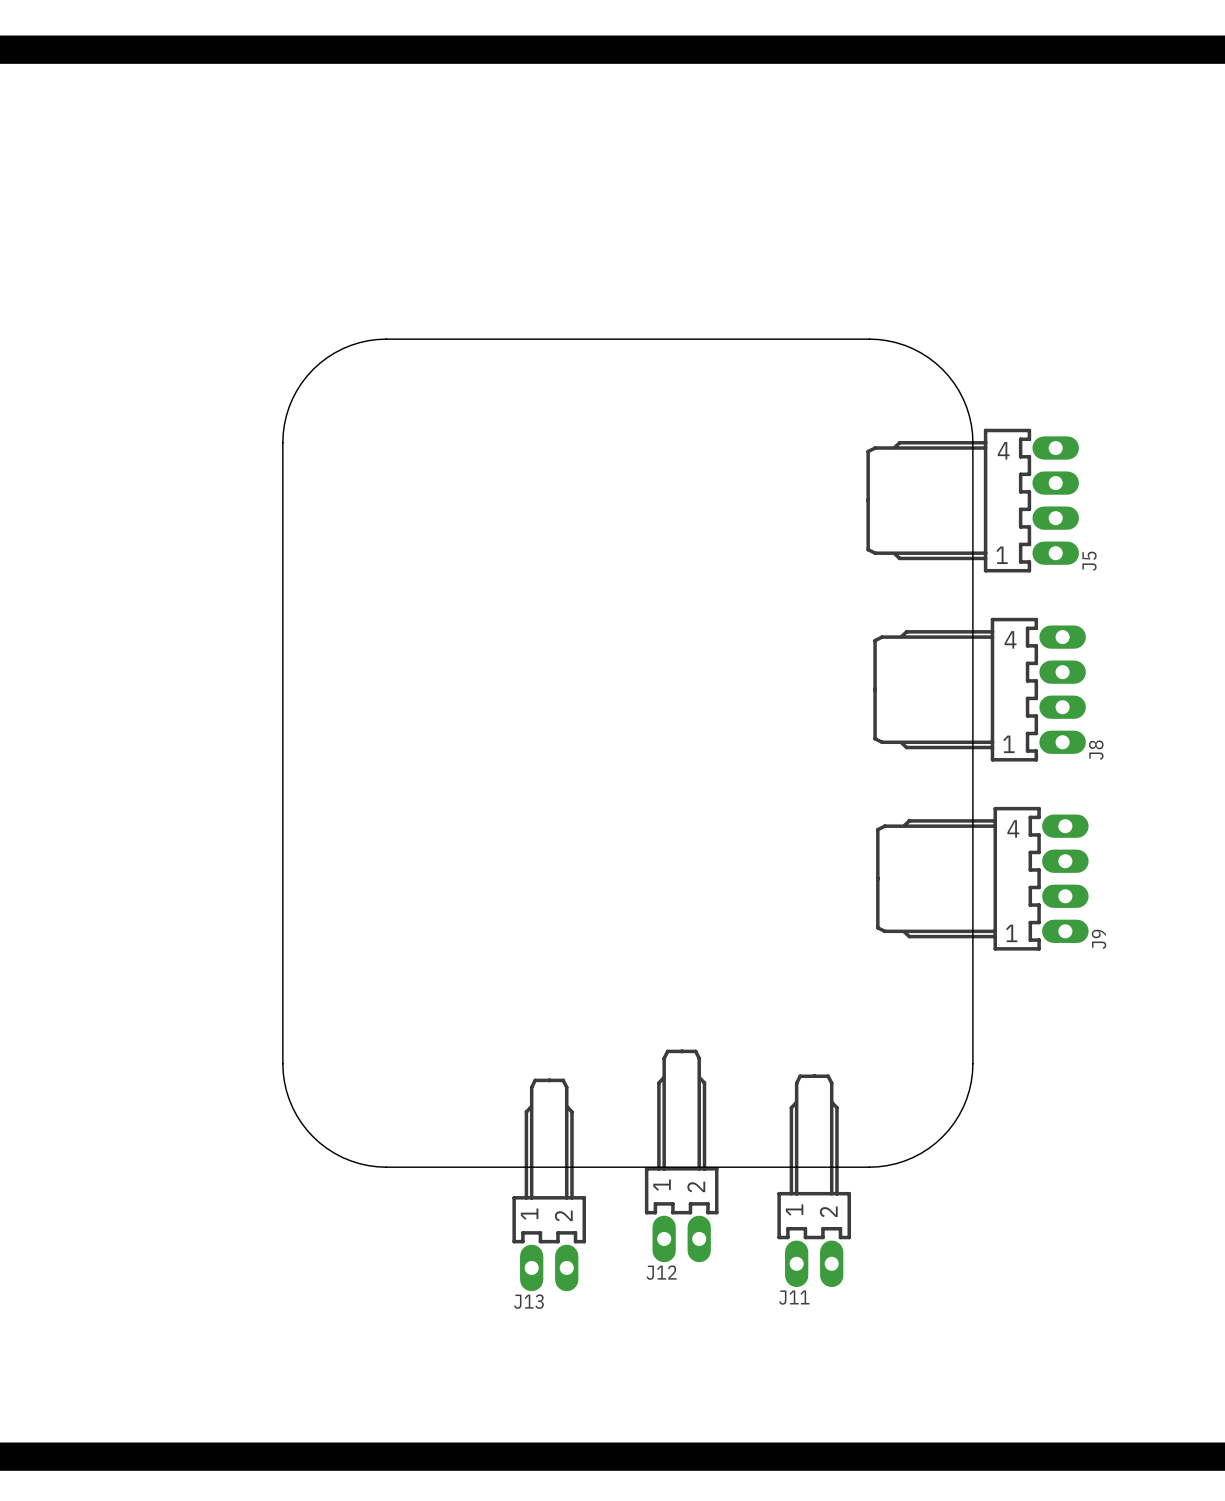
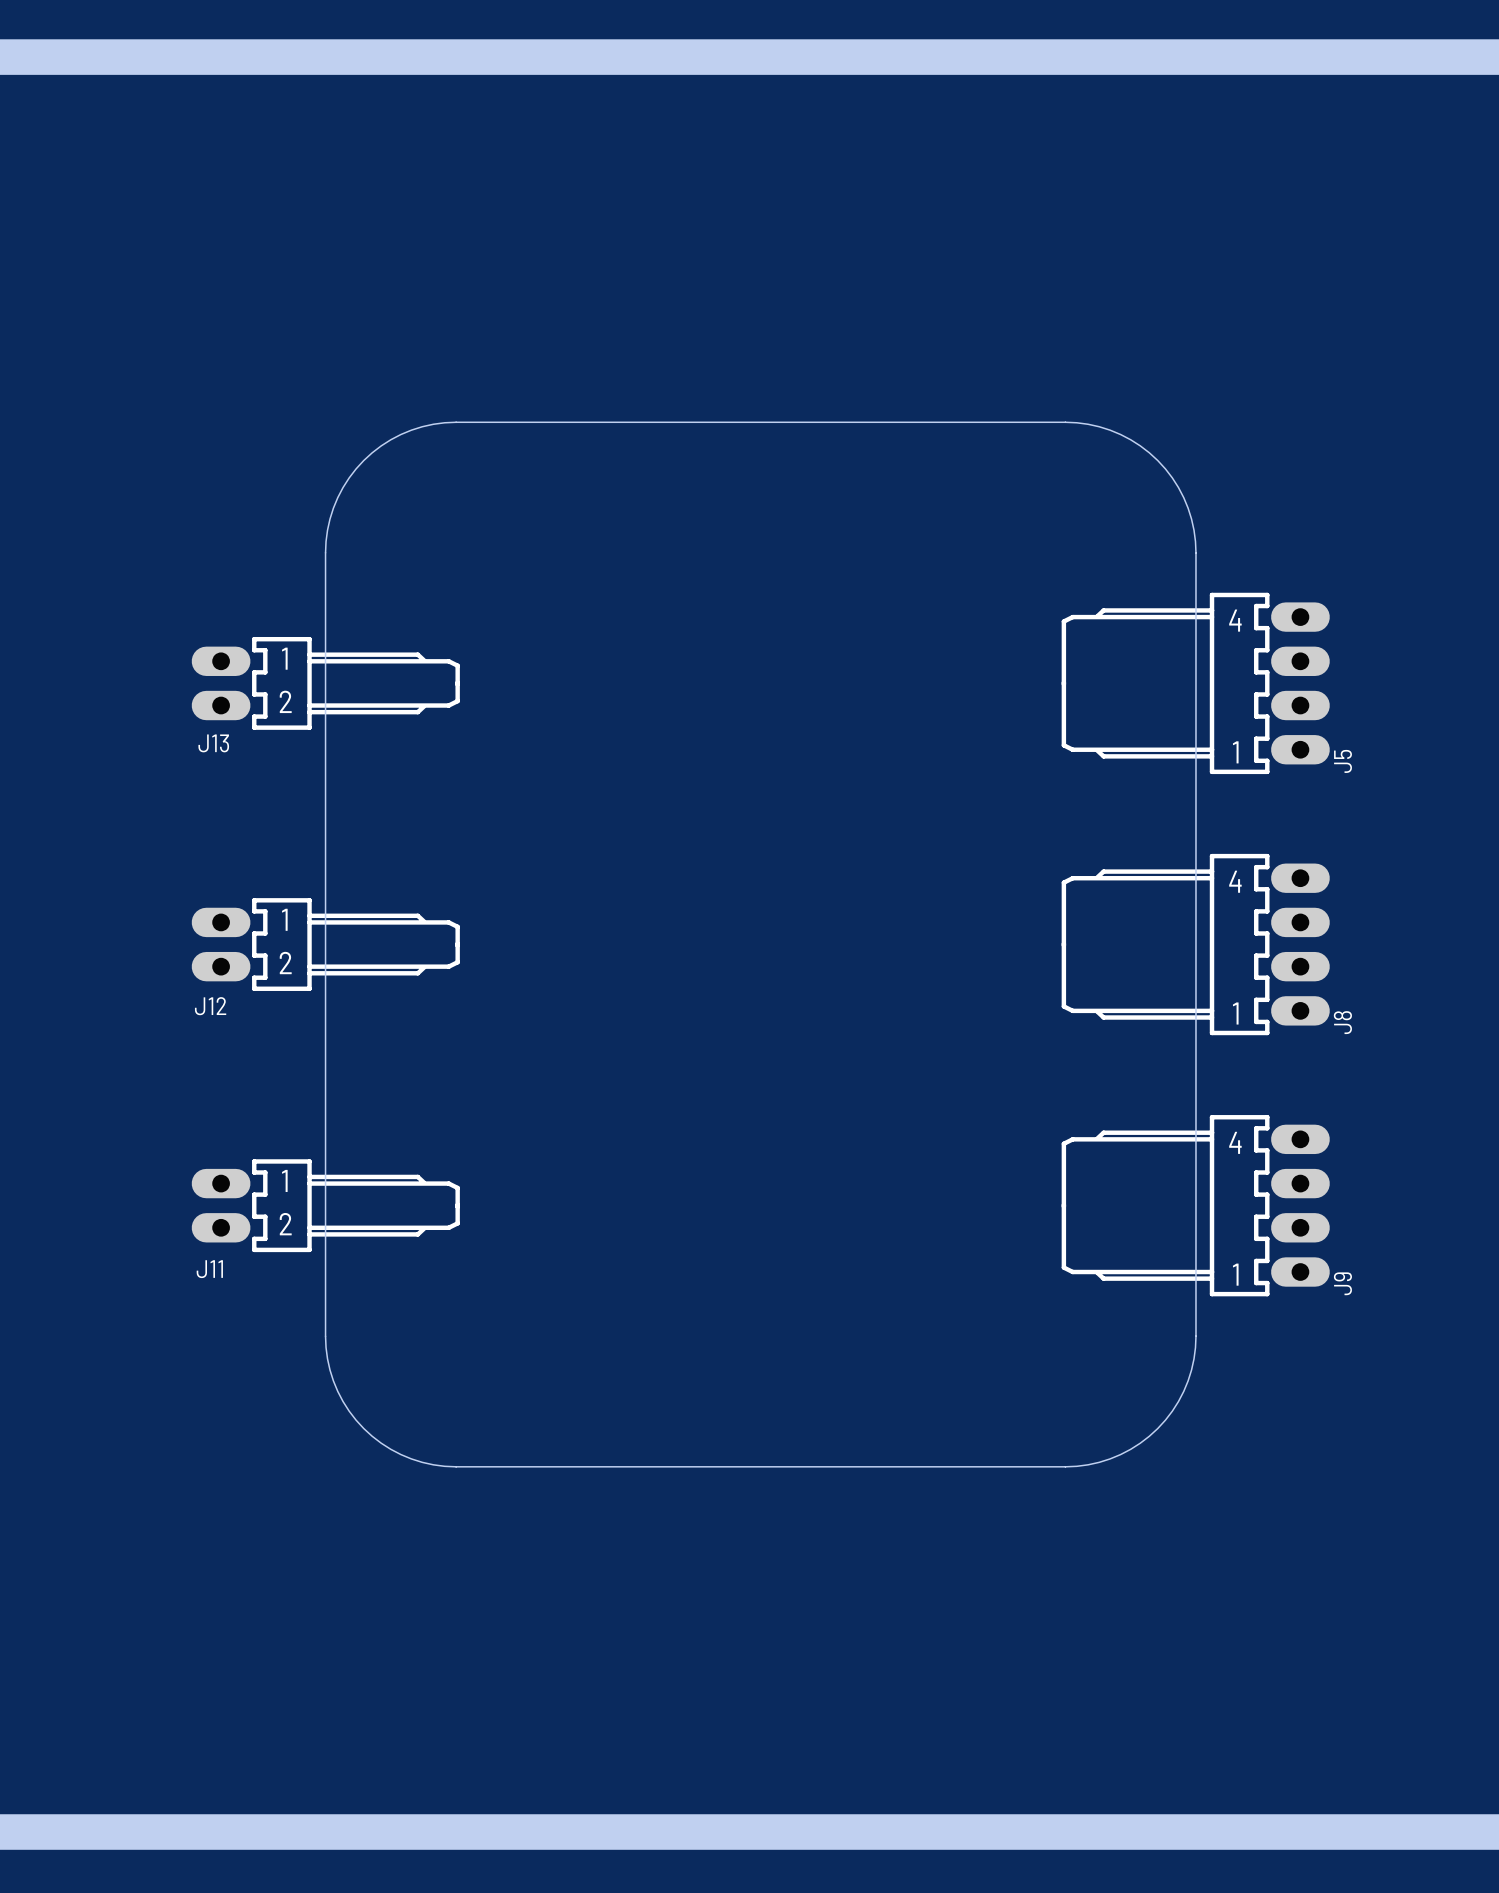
J5 position: (972, 500) -> (1195, 683)
J8 position: (979, 689) -> (1195, 944)
J9 position: (982, 878) -> (1195, 1205)
J12 rotation: 0° (681, 1155) -> 90° clockwise (325, 944)
J12 position: (681, 1155) -> (325, 944)
J11 rotation: 0° (814, 1180) -> 90° clockwise (325, 1205)
J11 position: (814, 1180) -> (325, 1205)
J13 rotation: 0° (549, 1184) -> 90° clockwise (325, 683)
J13 position: (549, 1184) -> (325, 683)
J12 name position: J12 (661, 1272) -> J12 (210, 1006)
J11 name position: J11 (794, 1297) -> J11 (209, 1269)
J13 name position: J13 (528, 1301) -> J13 (213, 743)

